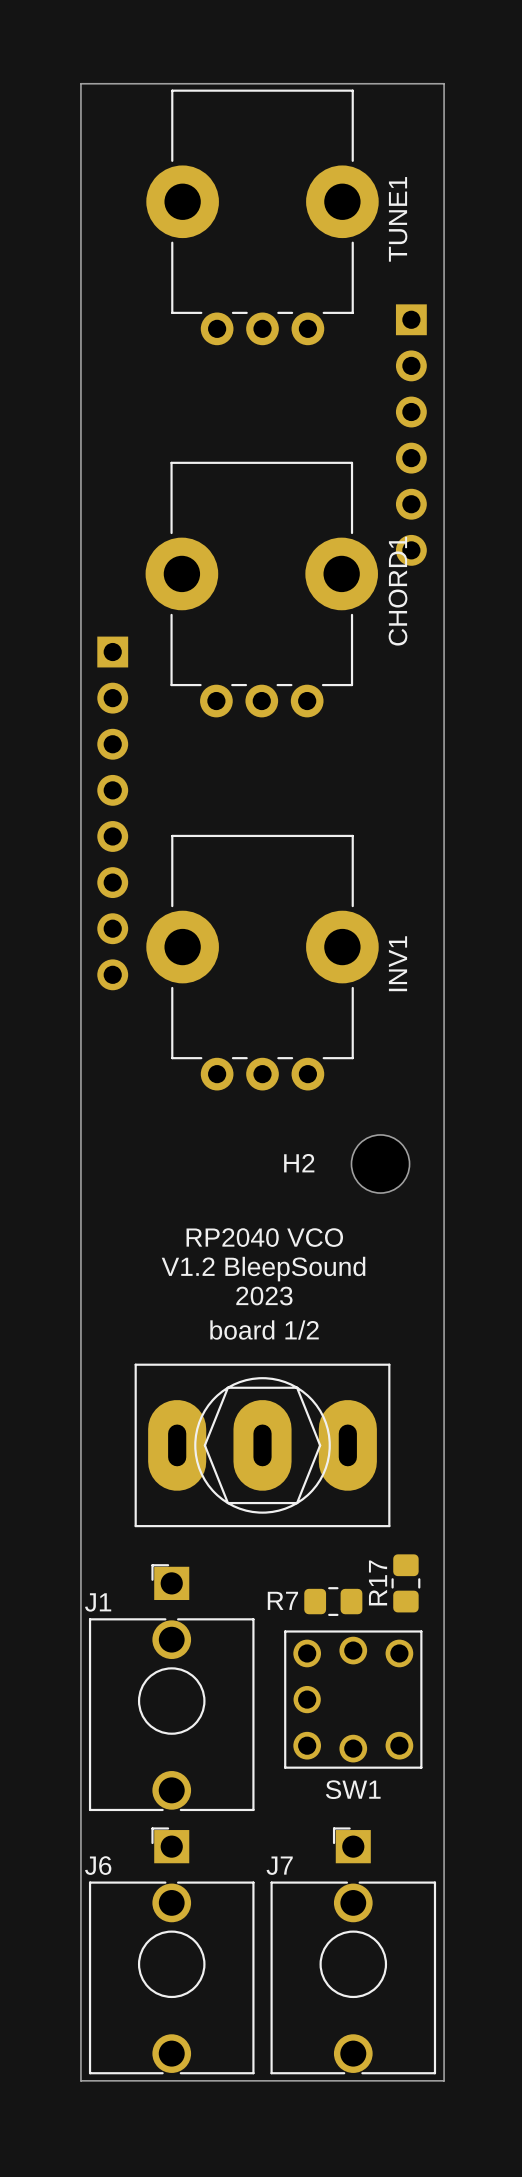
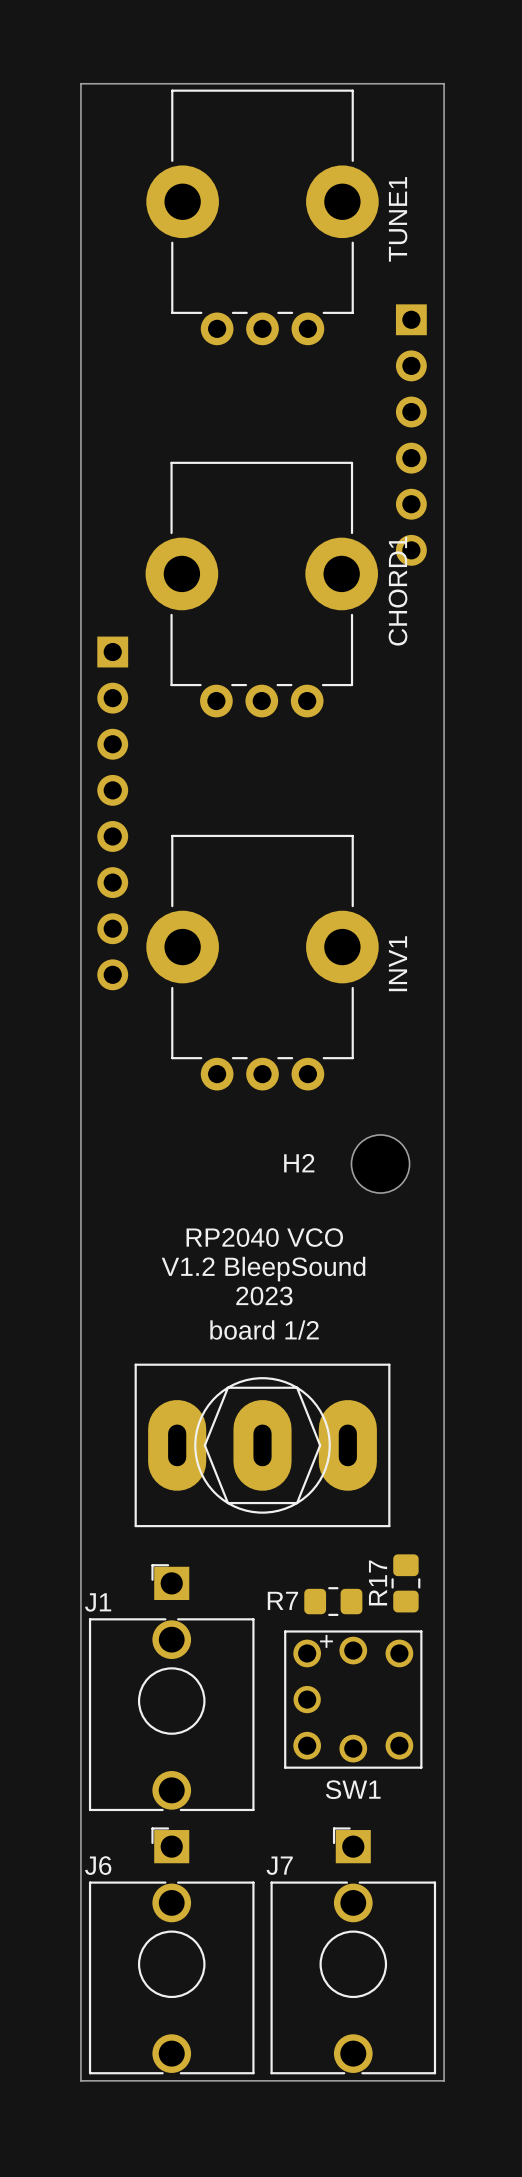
SW1 text: none -> + (326, 1641)

